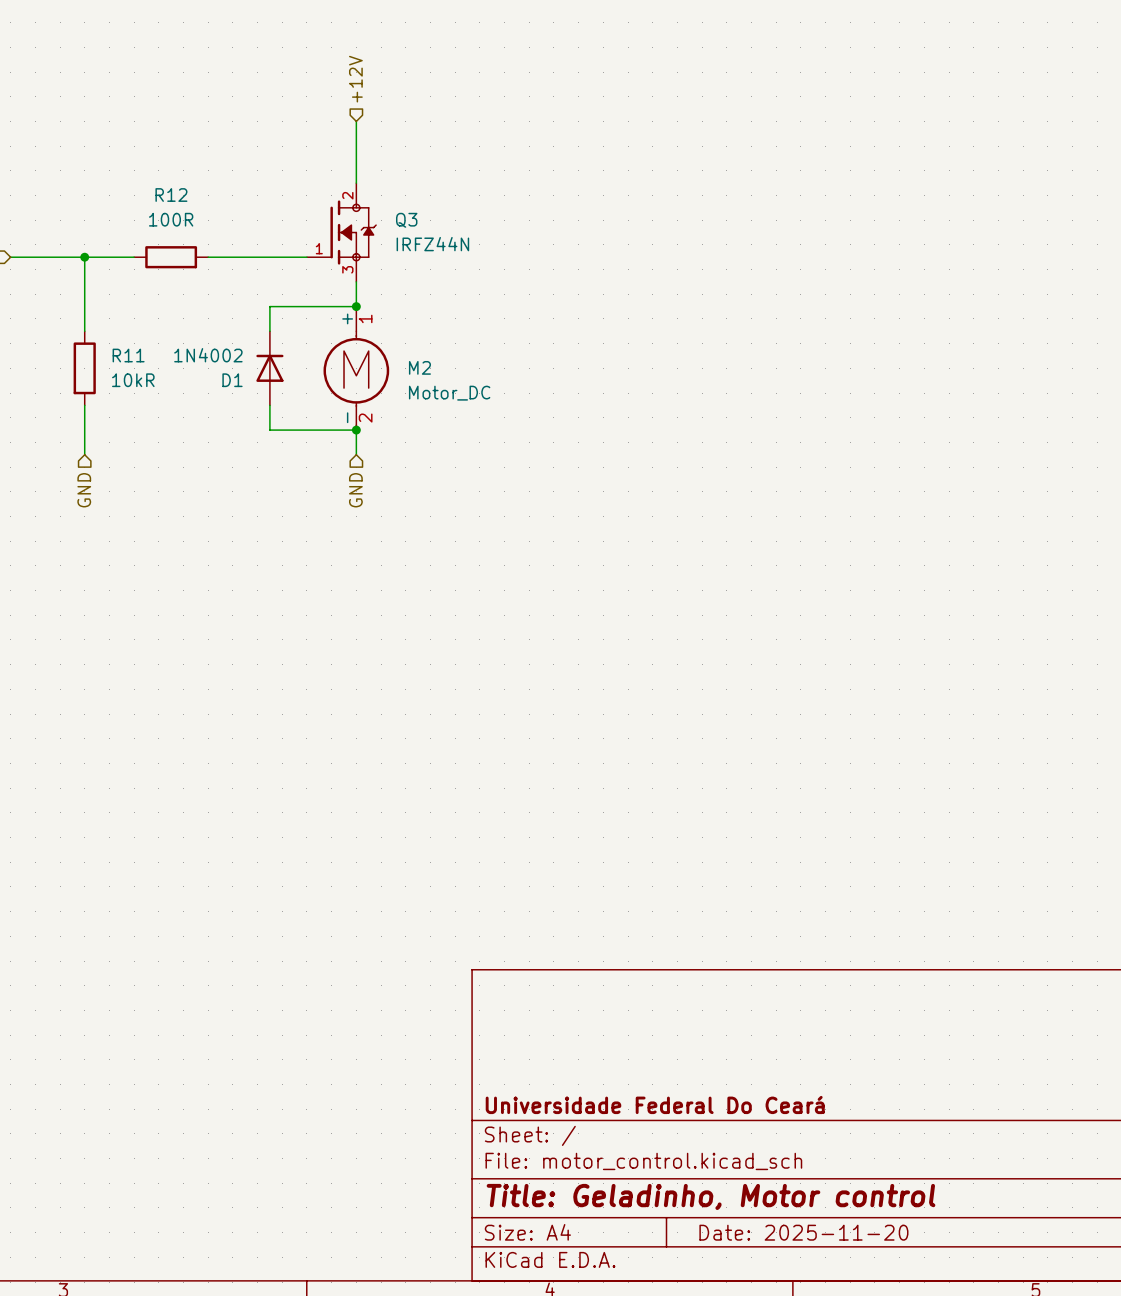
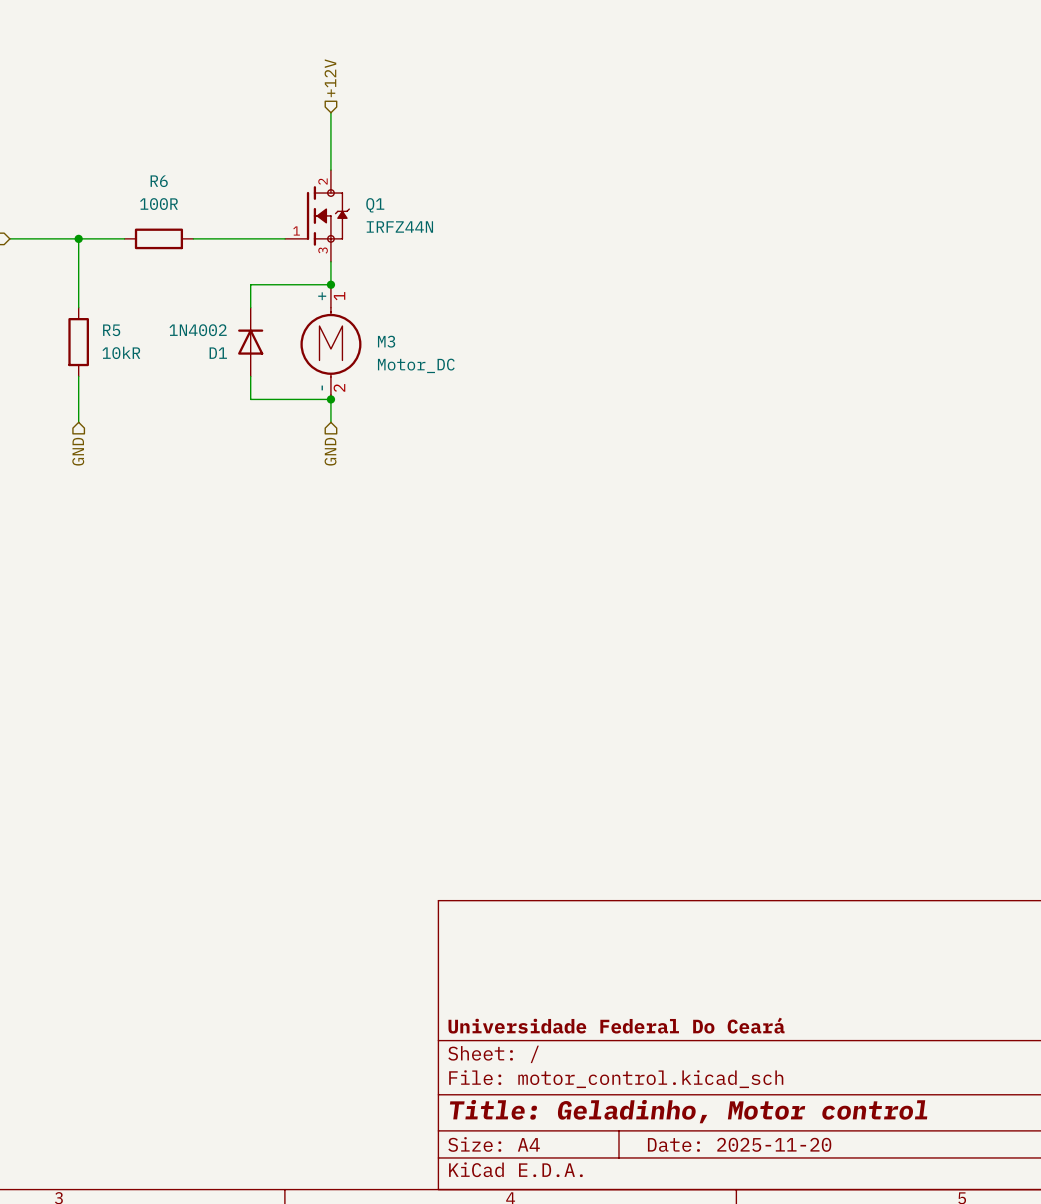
R12 name: R12 (171, 195) -> R6 (159, 181)
Q3 name: Q3 (406, 220) -> Q1 (375, 205)
R11 name: R11 (128, 355) -> R5 (111, 330)
M2 name: M2 (419, 367) -> M3 (386, 341)

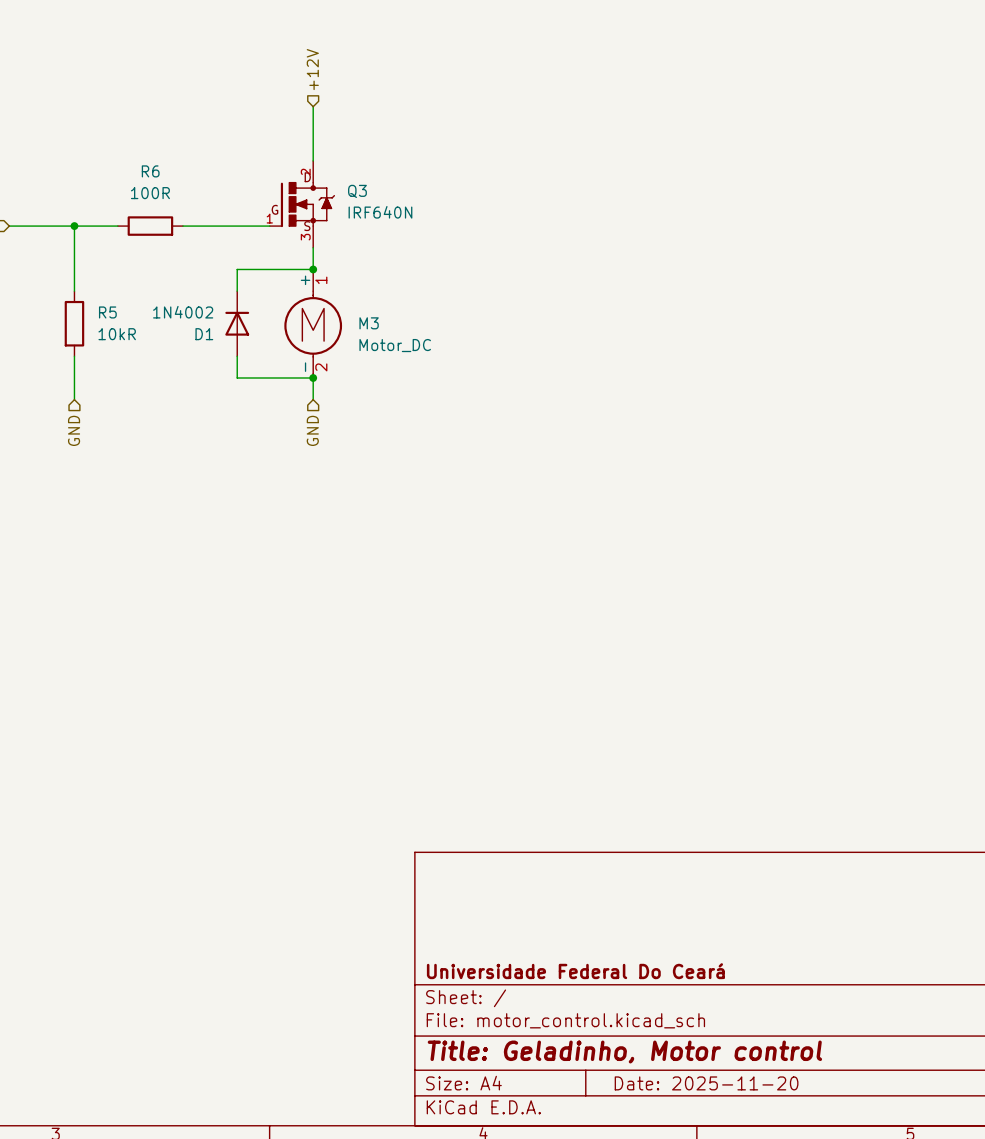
Q1: IRFZ44N (317, 215) -> none
Q3: none -> IRF640N (302, 204)

